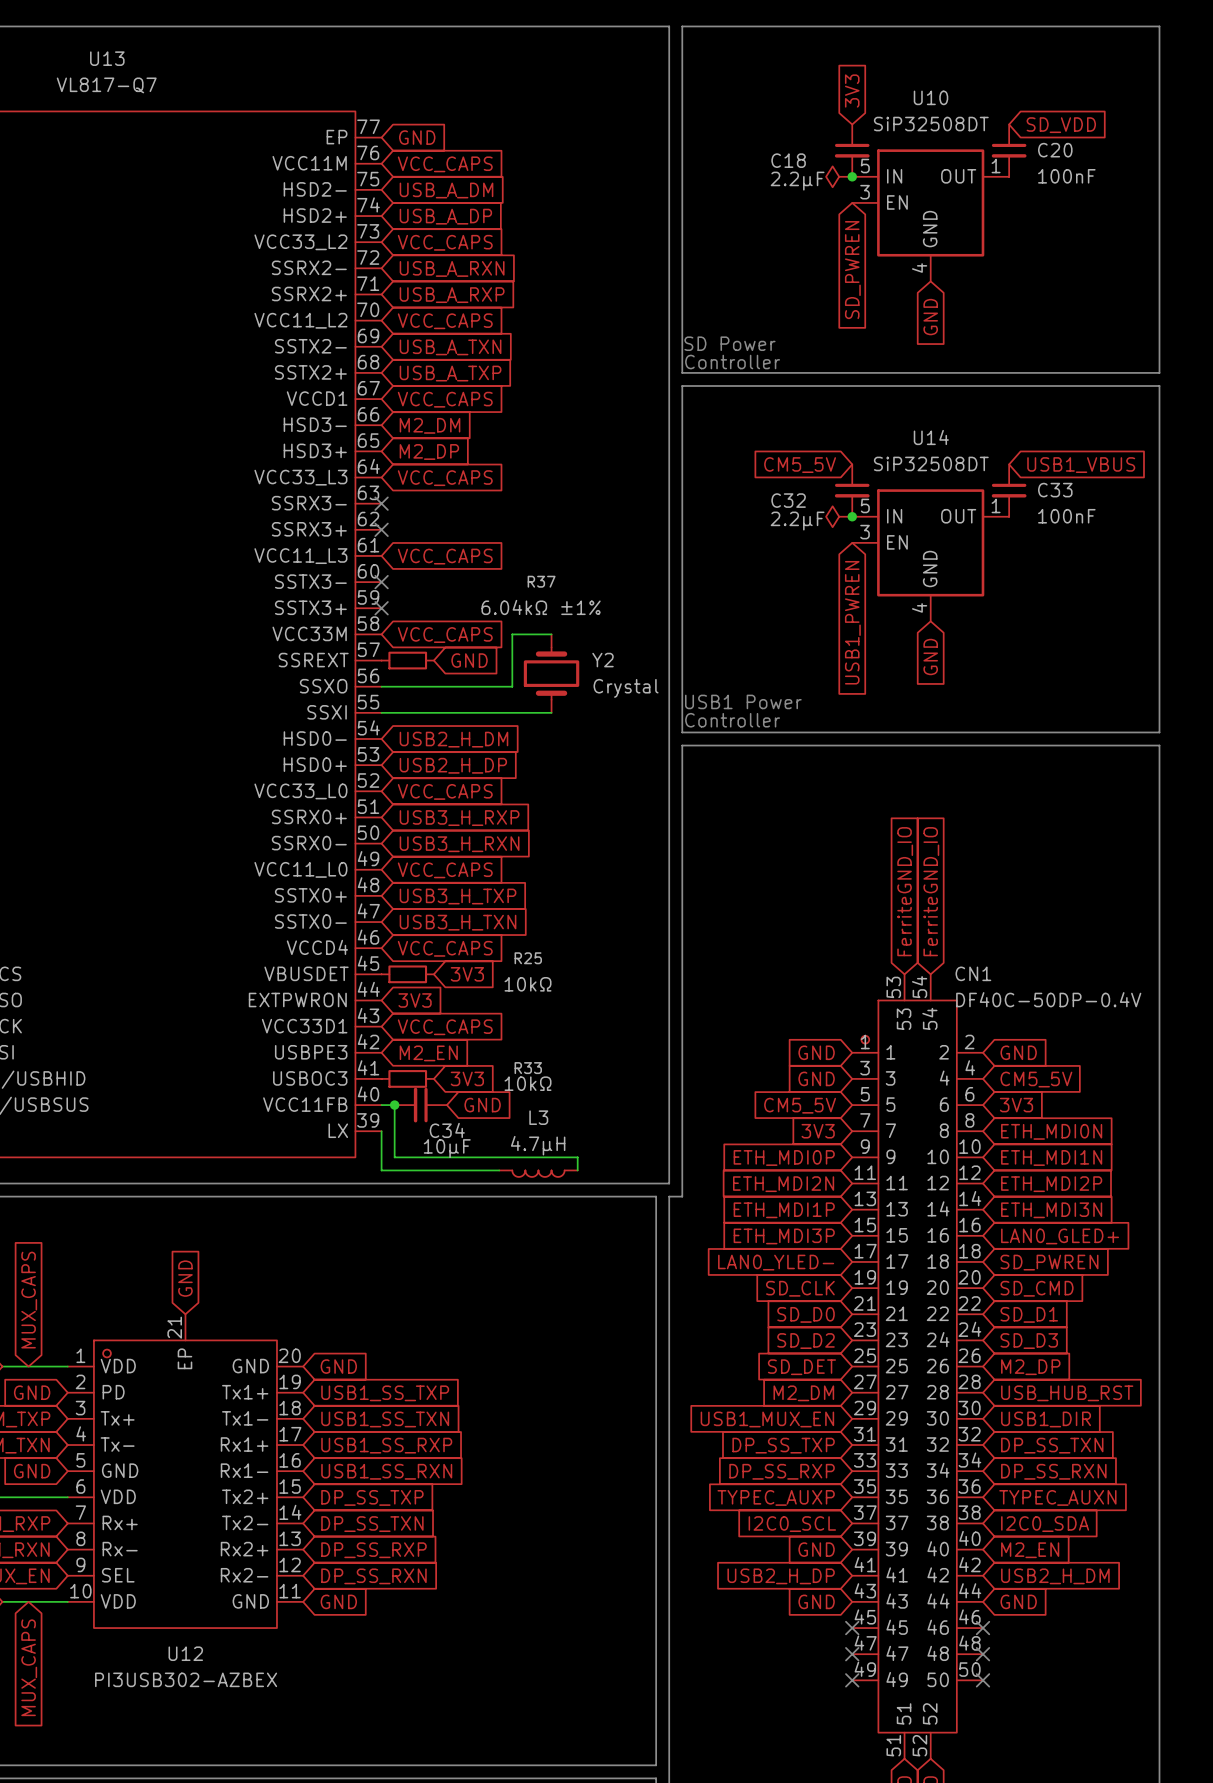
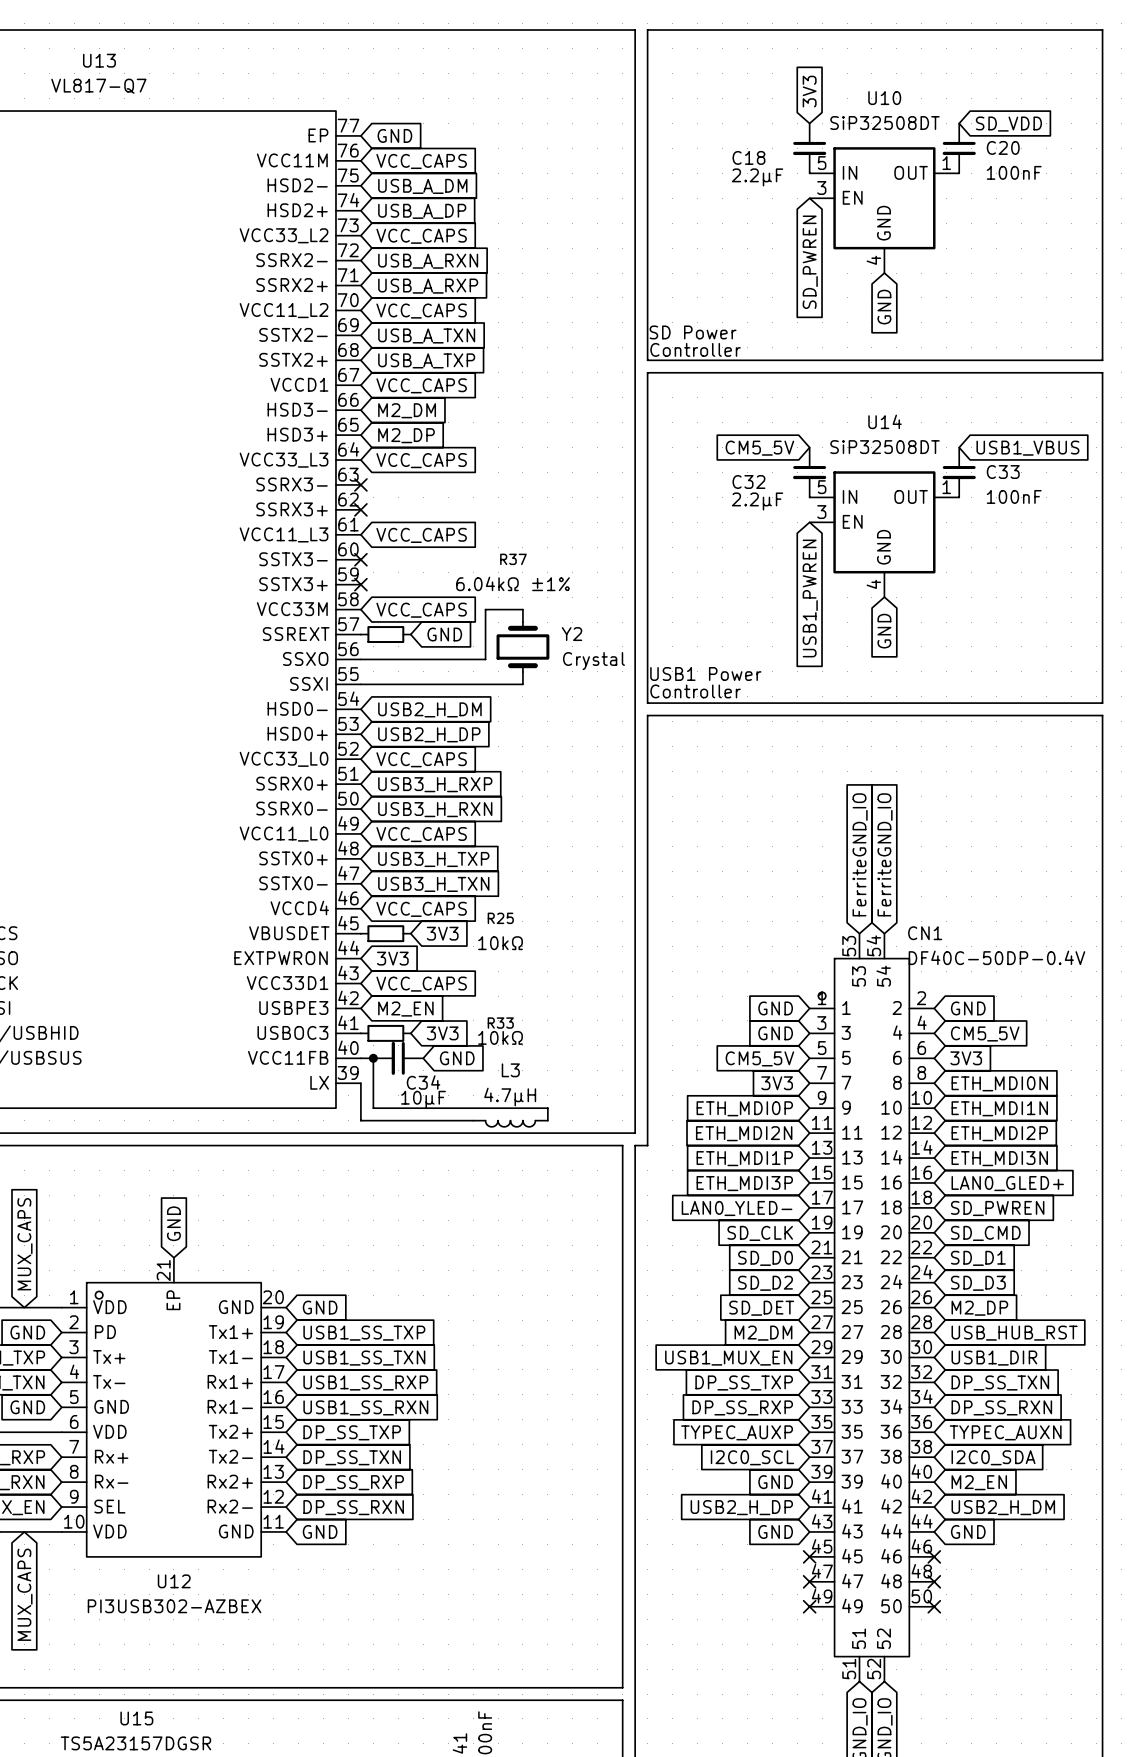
power symbol: (839, 176) -> none
junction: (852, 176) -> none
power symbol: (839, 516) -> none
junction: (852, 516) -> none

